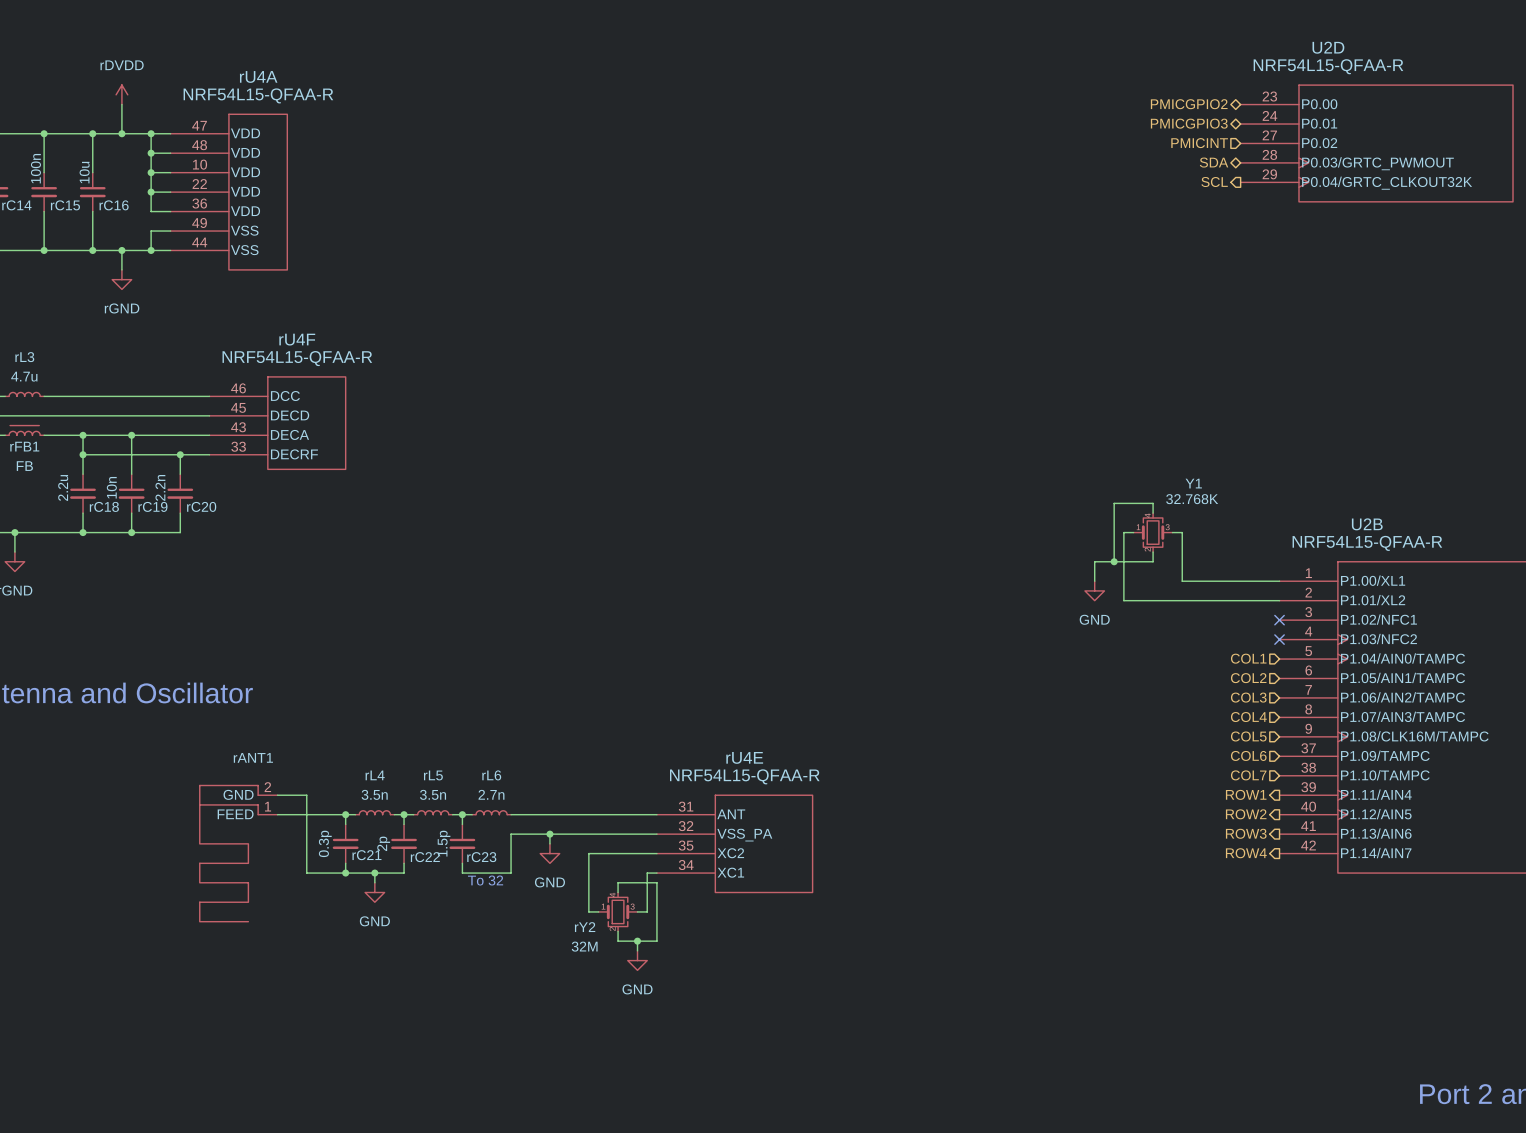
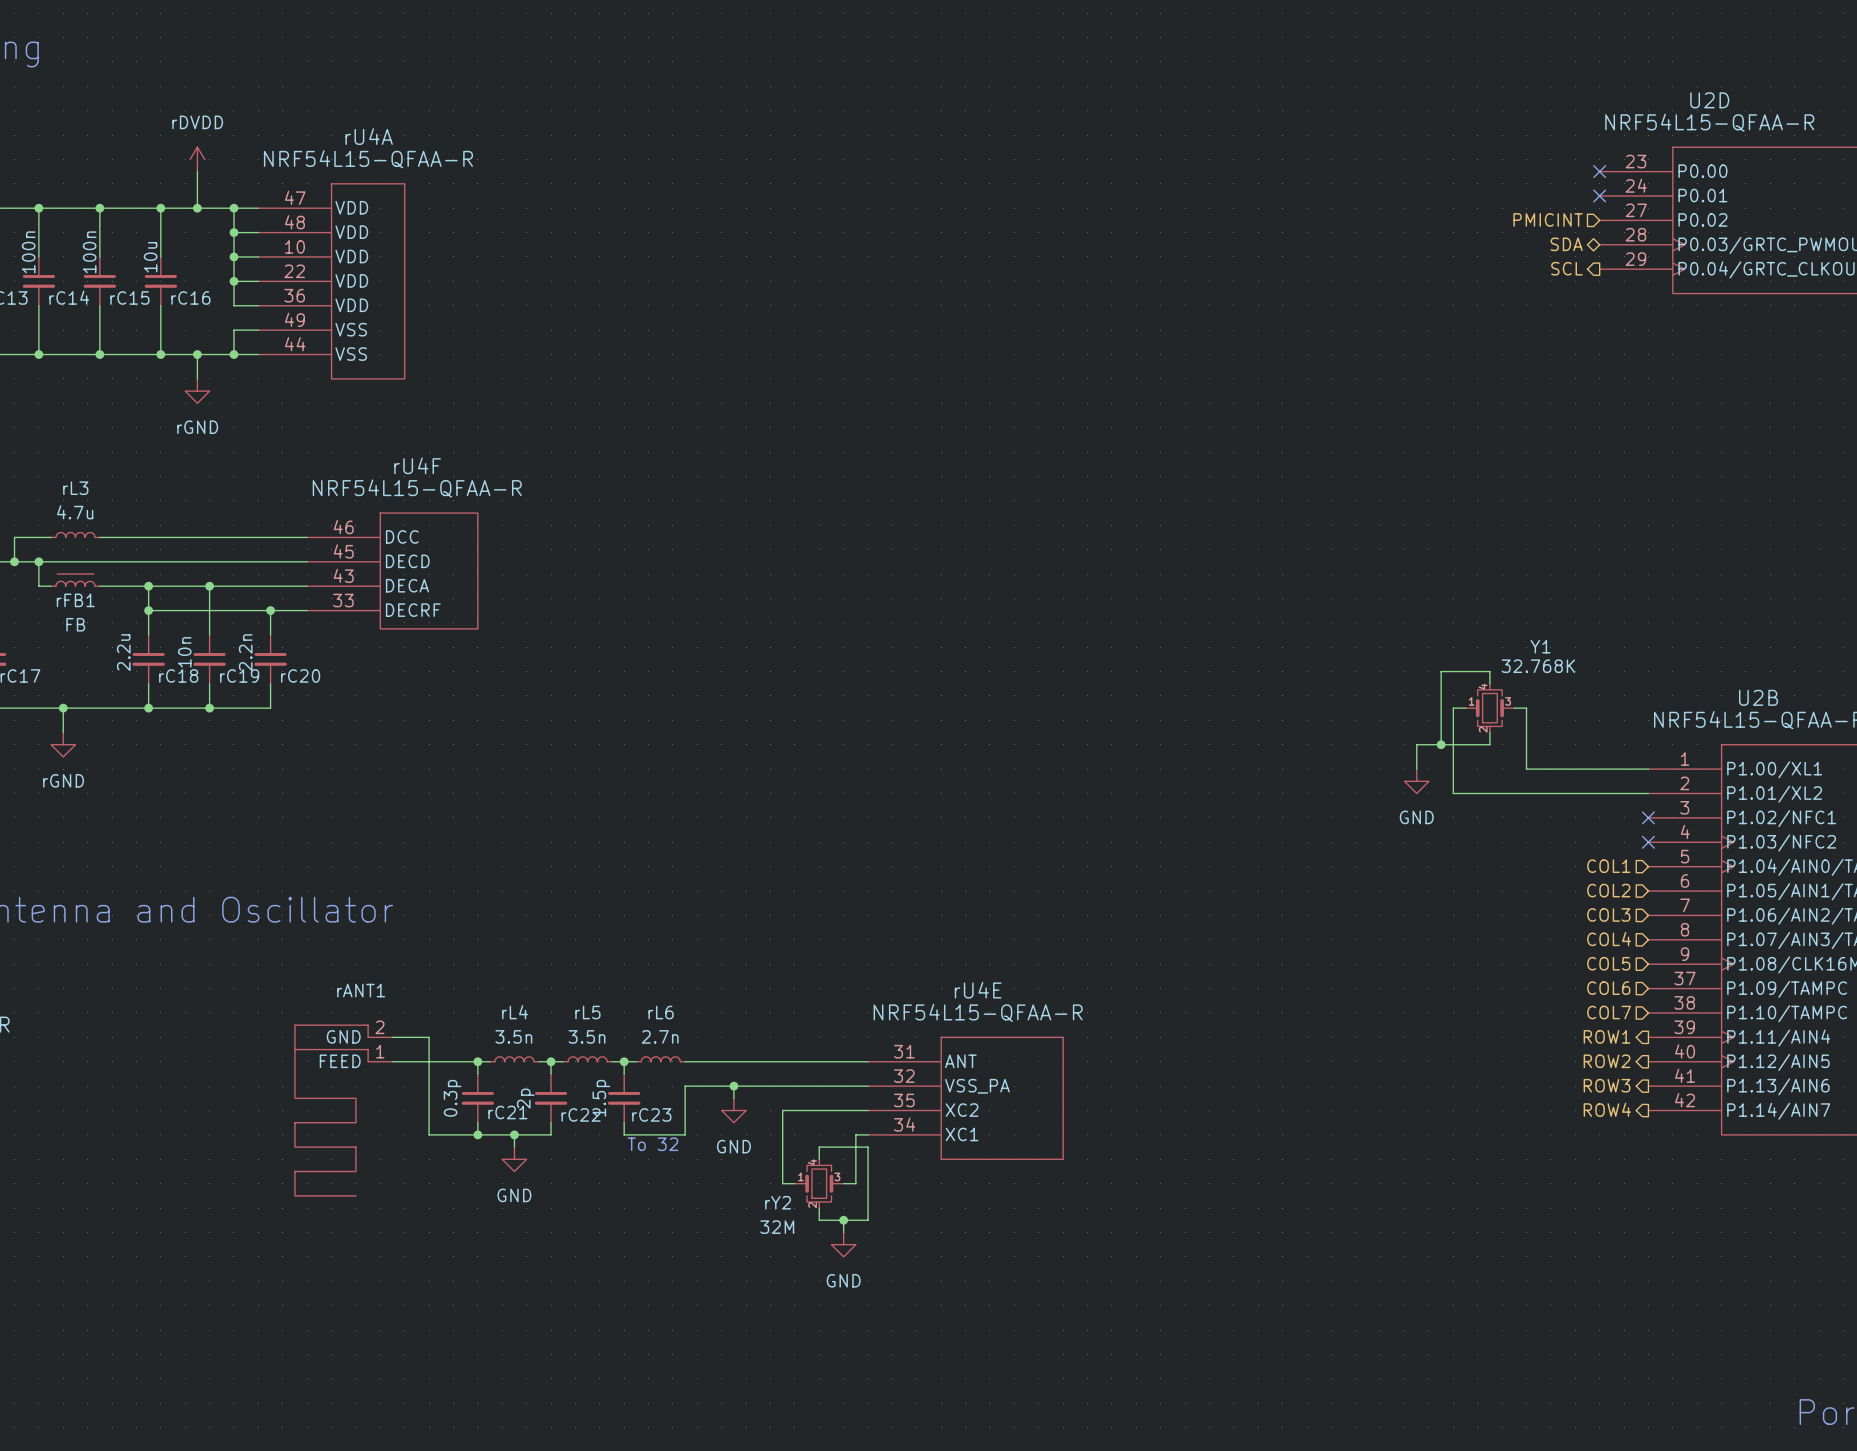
hierarchical label: PMICGPIO2 (1189, 104) -> none
no-connect mark: none -> (1599, 171)
hierarchical label: PMICGPIO3 (1189, 123) -> none
no-connect mark: none -> (1599, 196)

